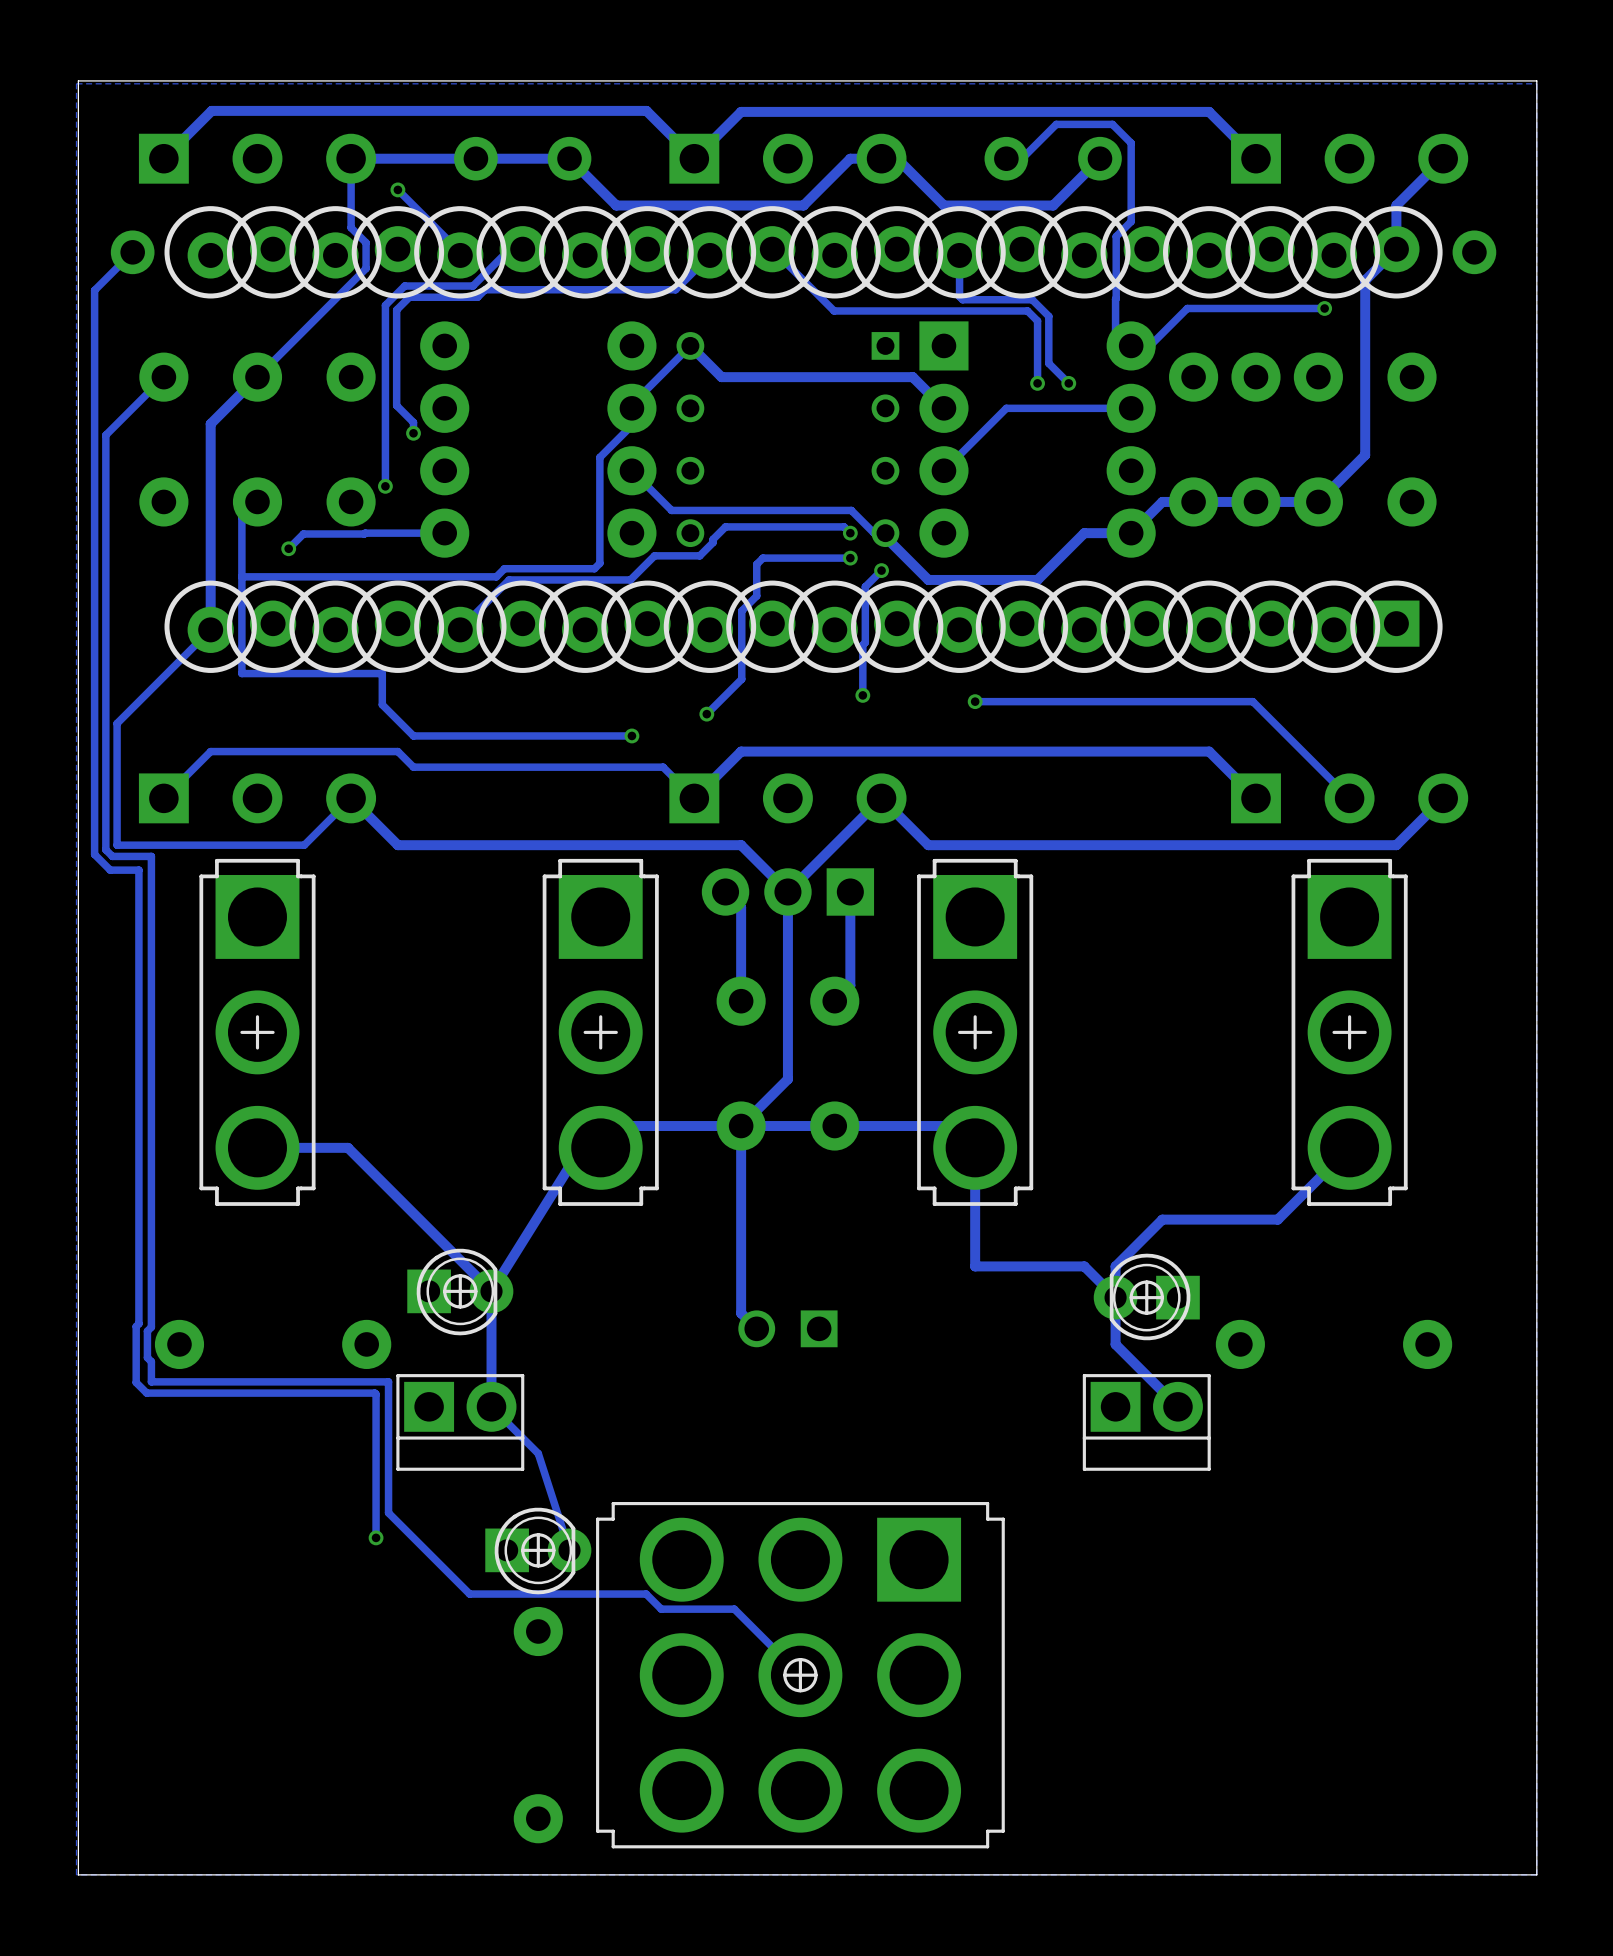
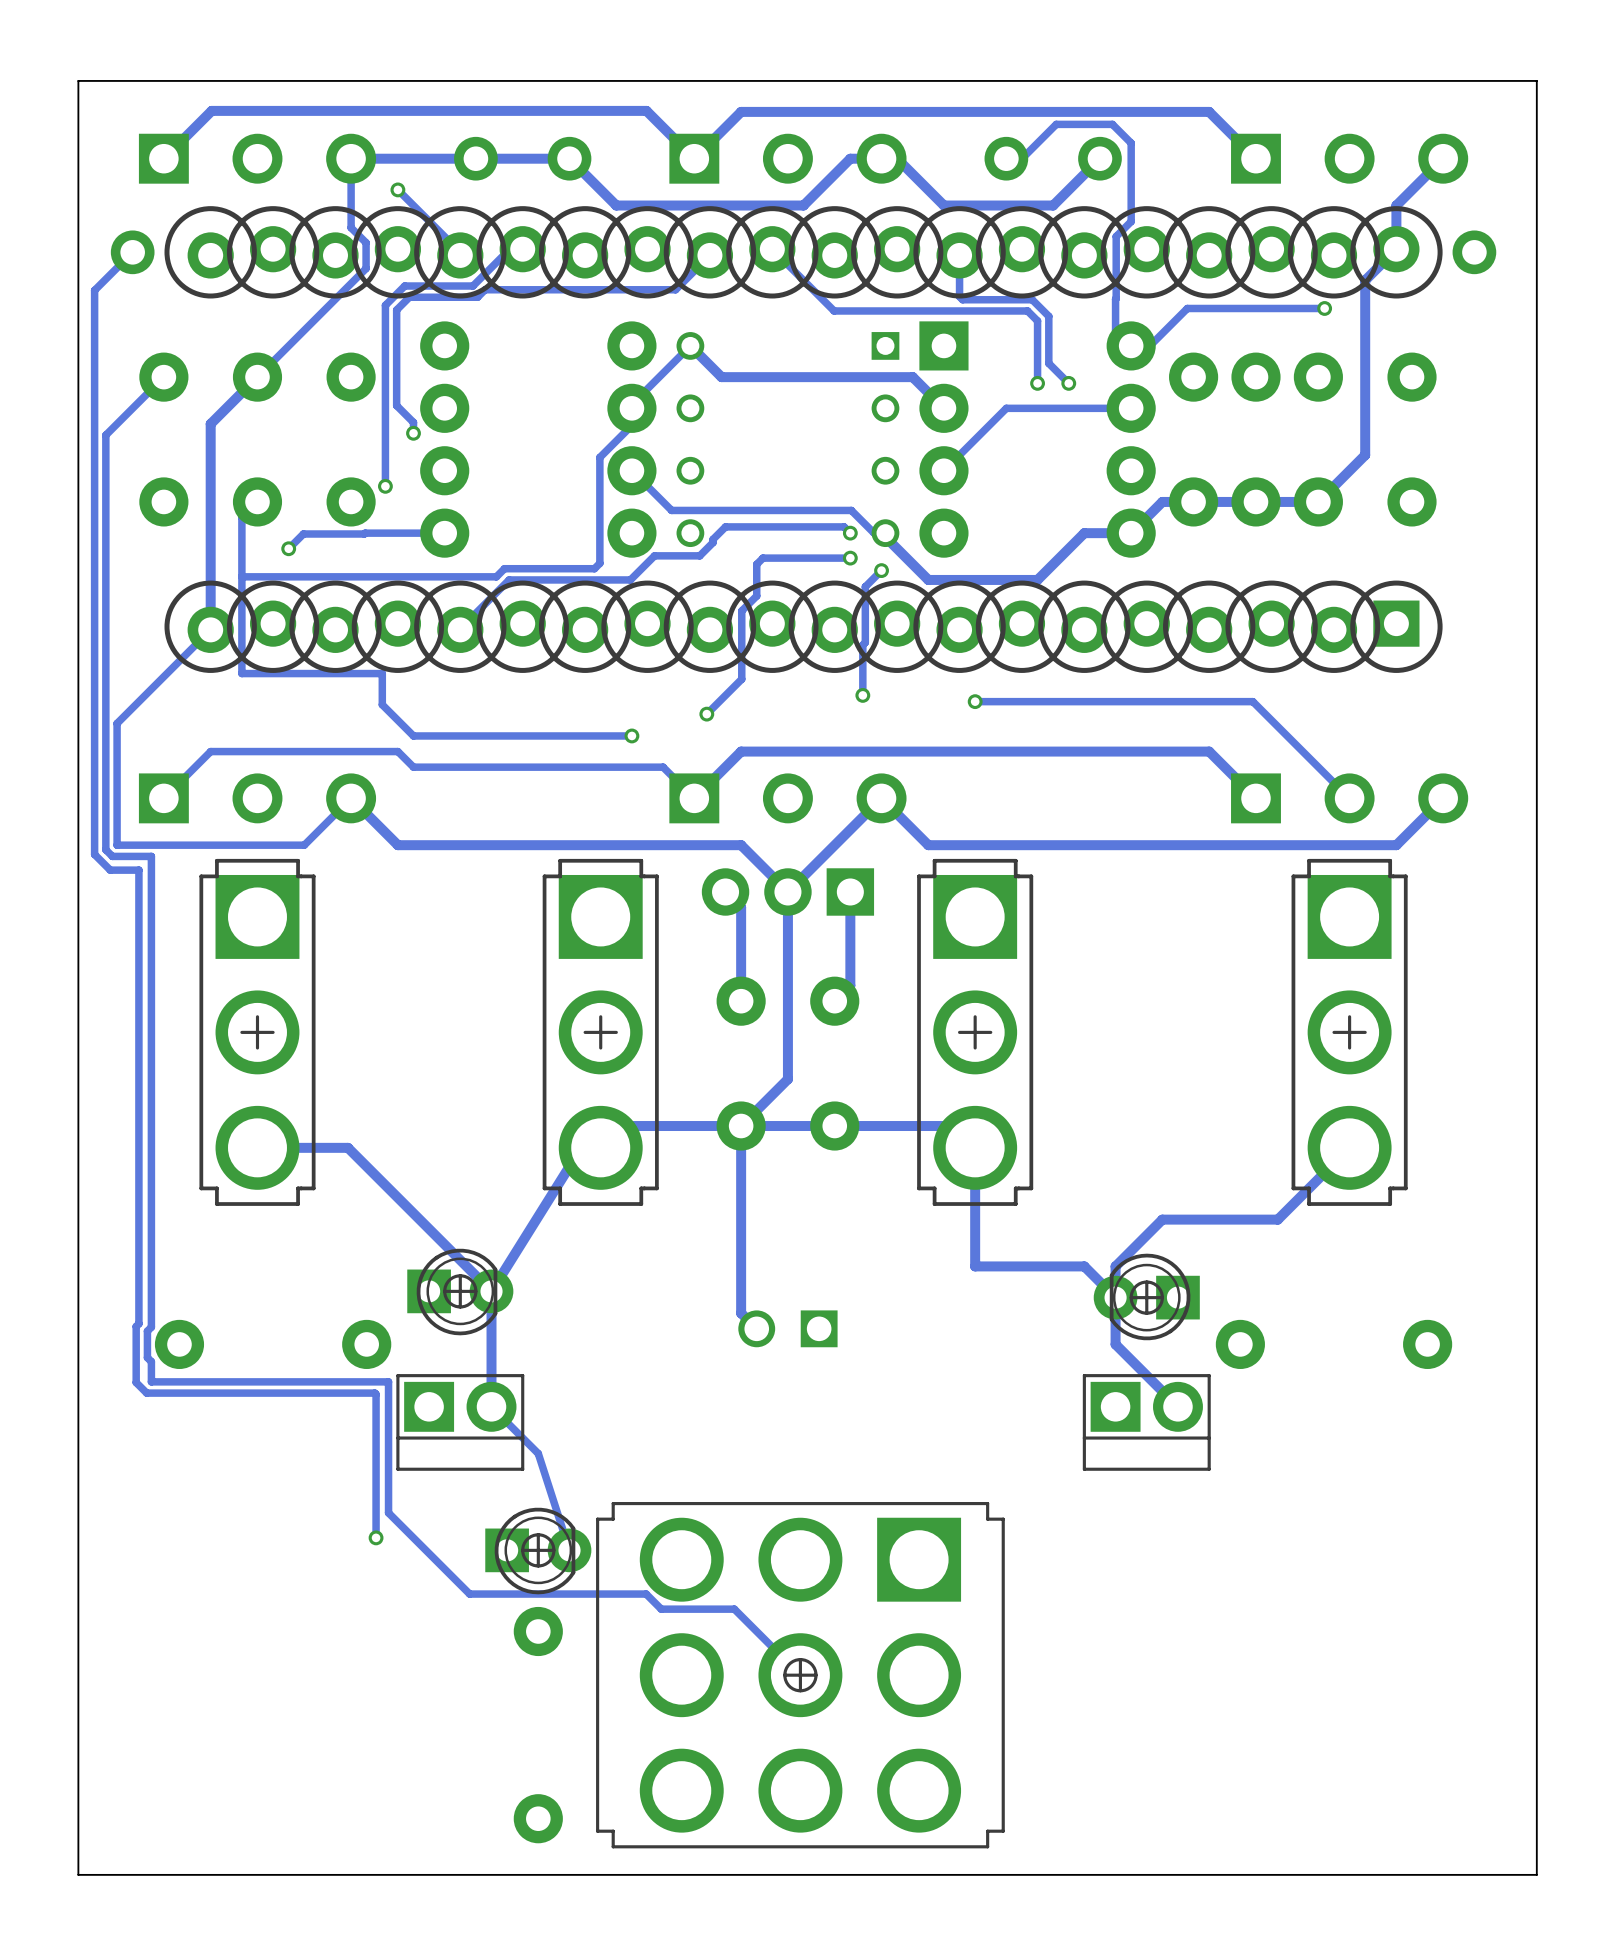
zone outline: (1536, 83) (1536, 1874) (76, 1874) (76, 83) (1536, 83) -> none

